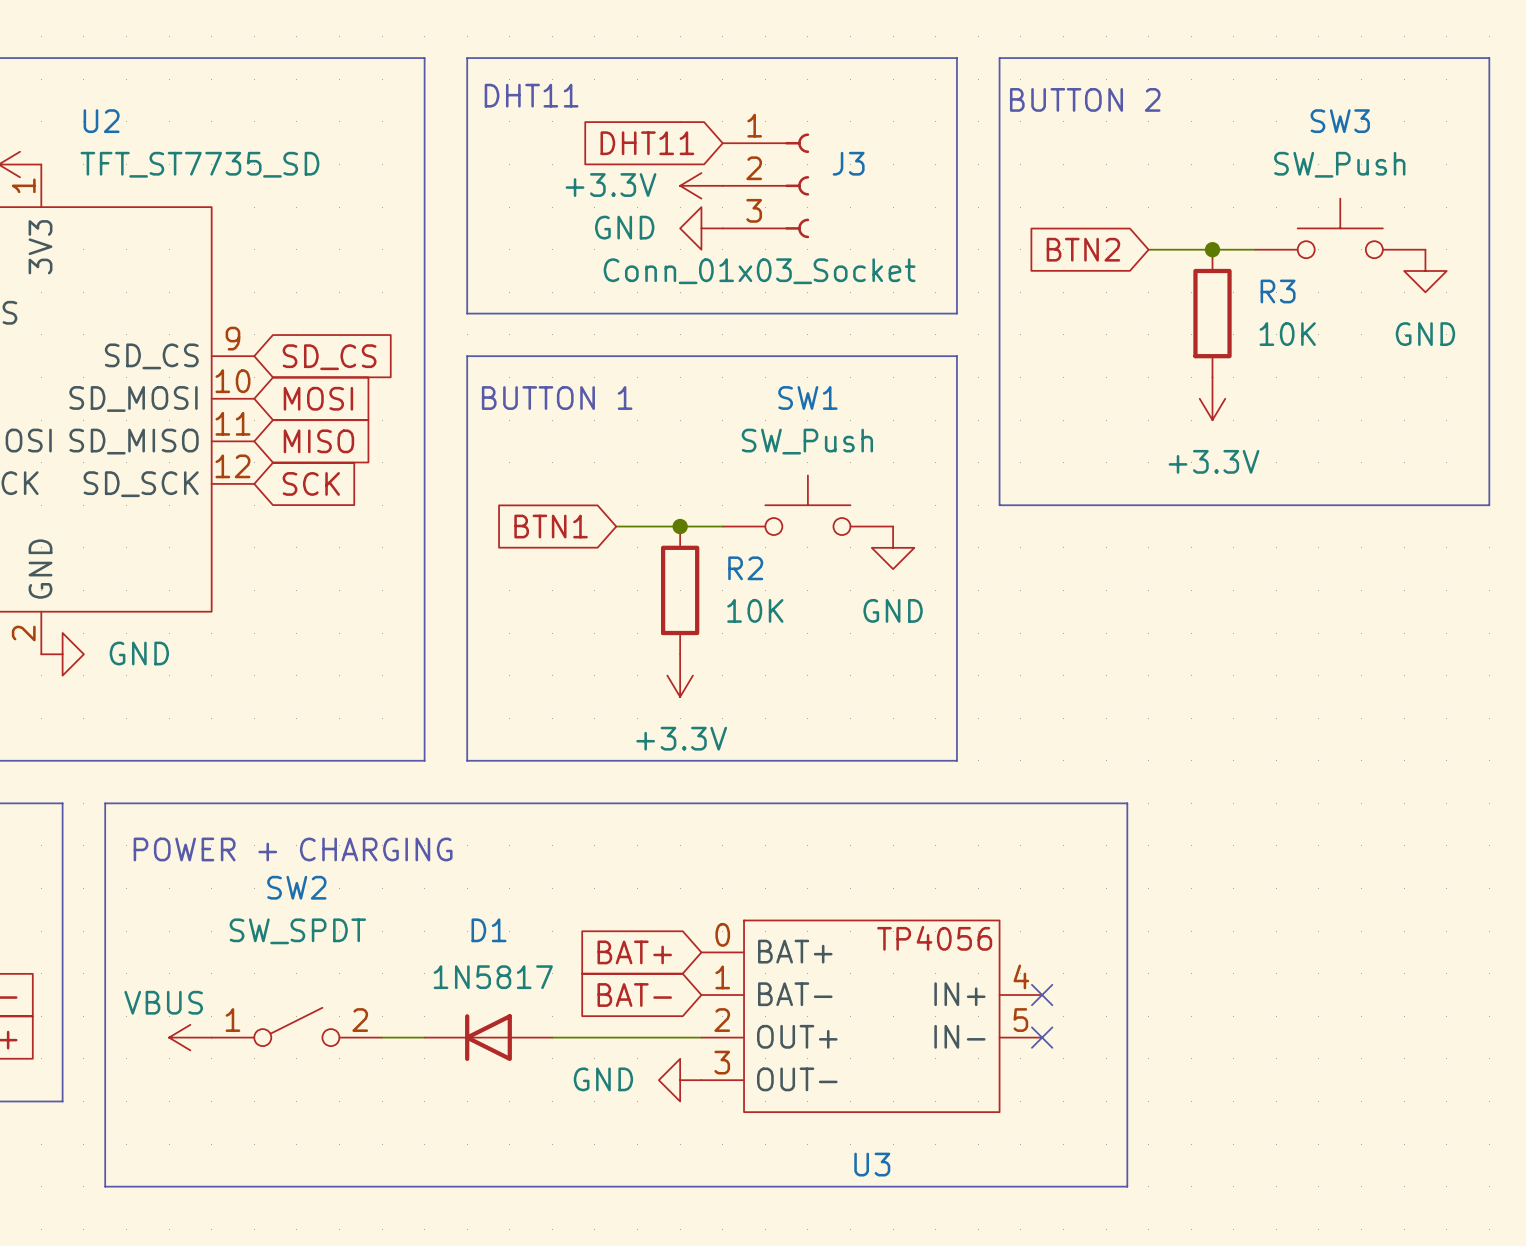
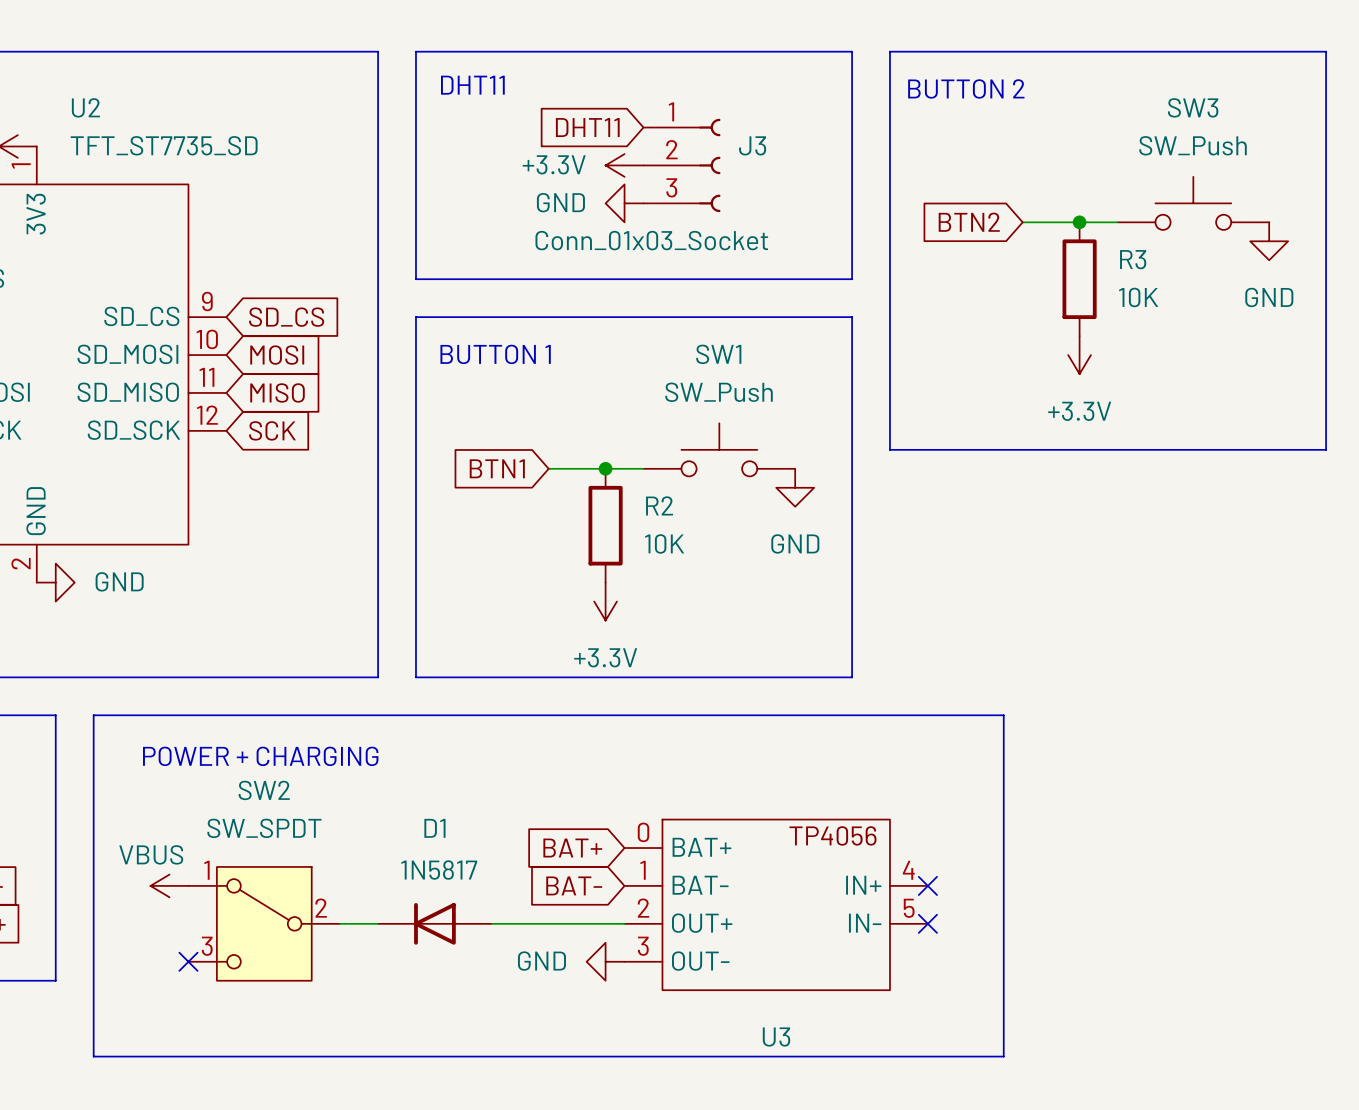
SW2 symbol: [211, 1007, 383, 1047] -> [188, 866, 341, 981]
power symbol position: VBUS (190, 1037) -> VBUS (169, 885)
no-connect mark: none -> (188, 961)

